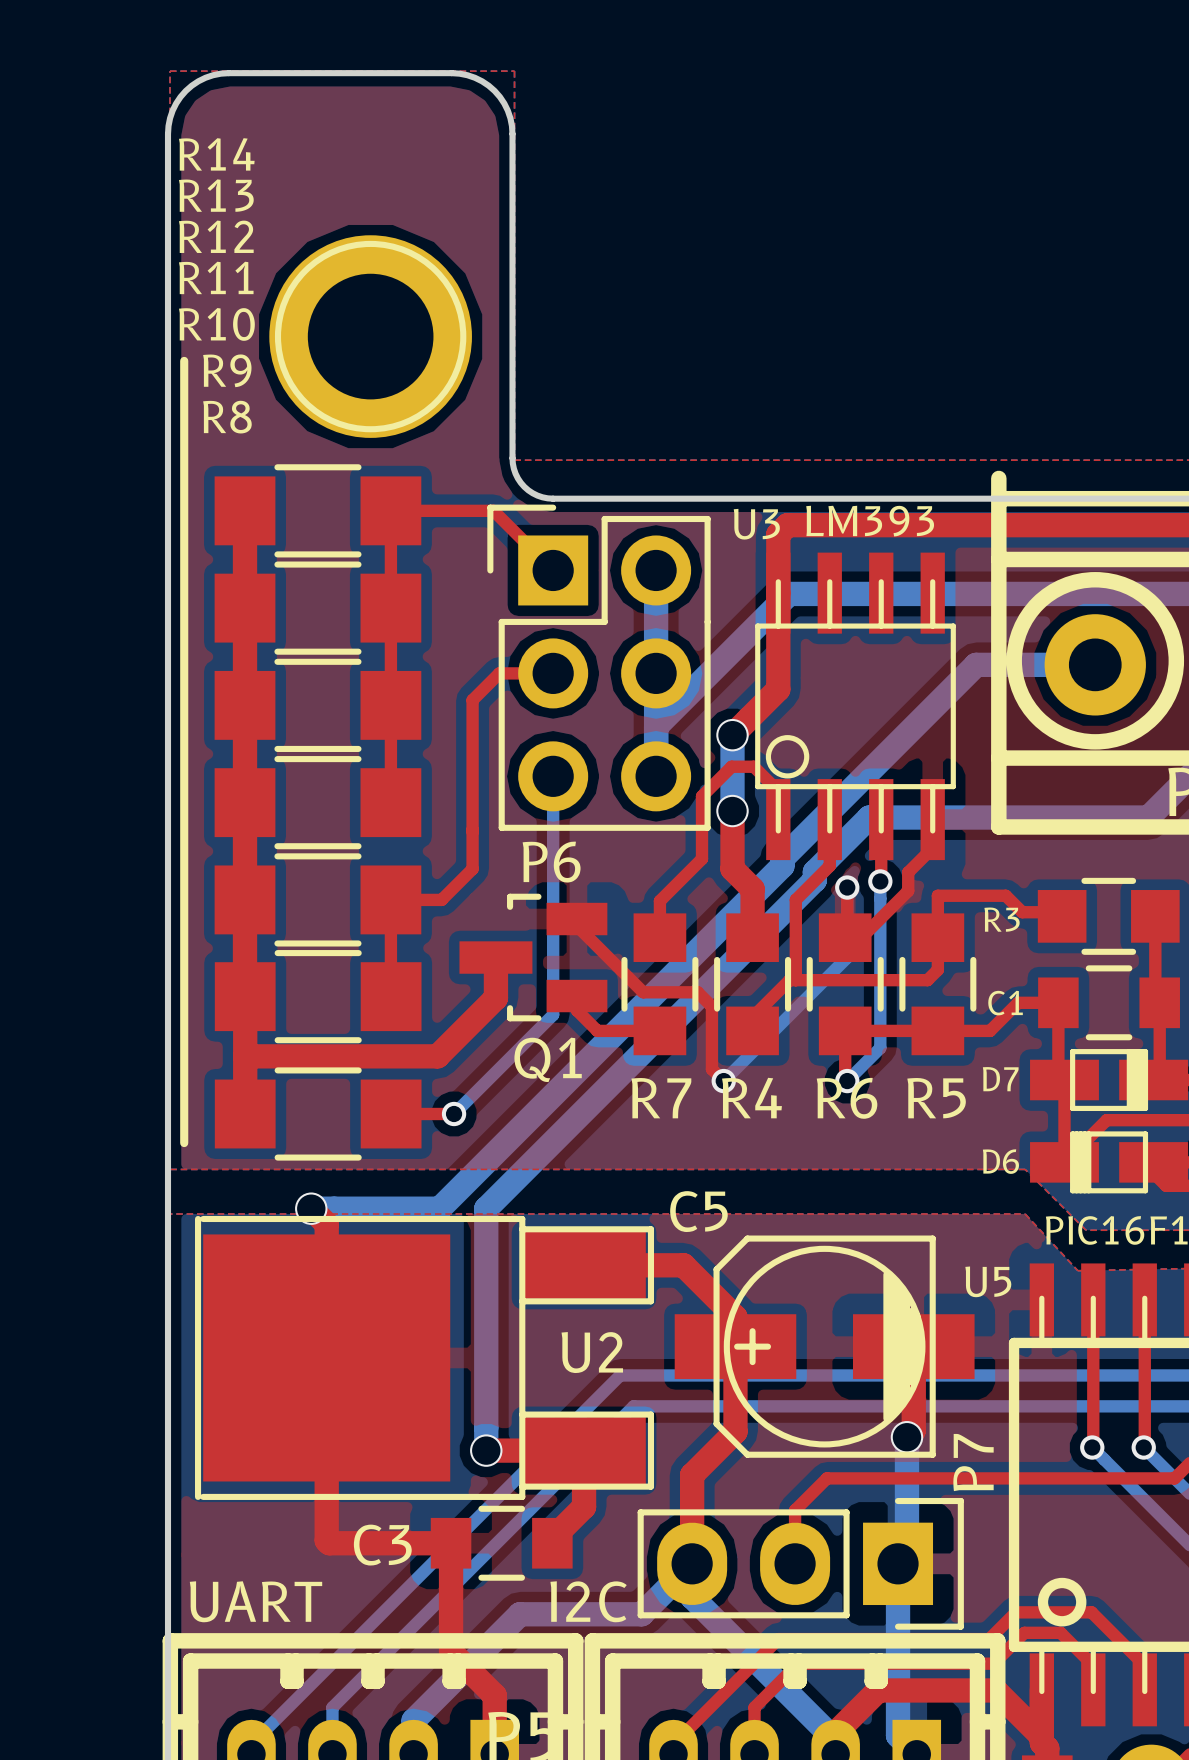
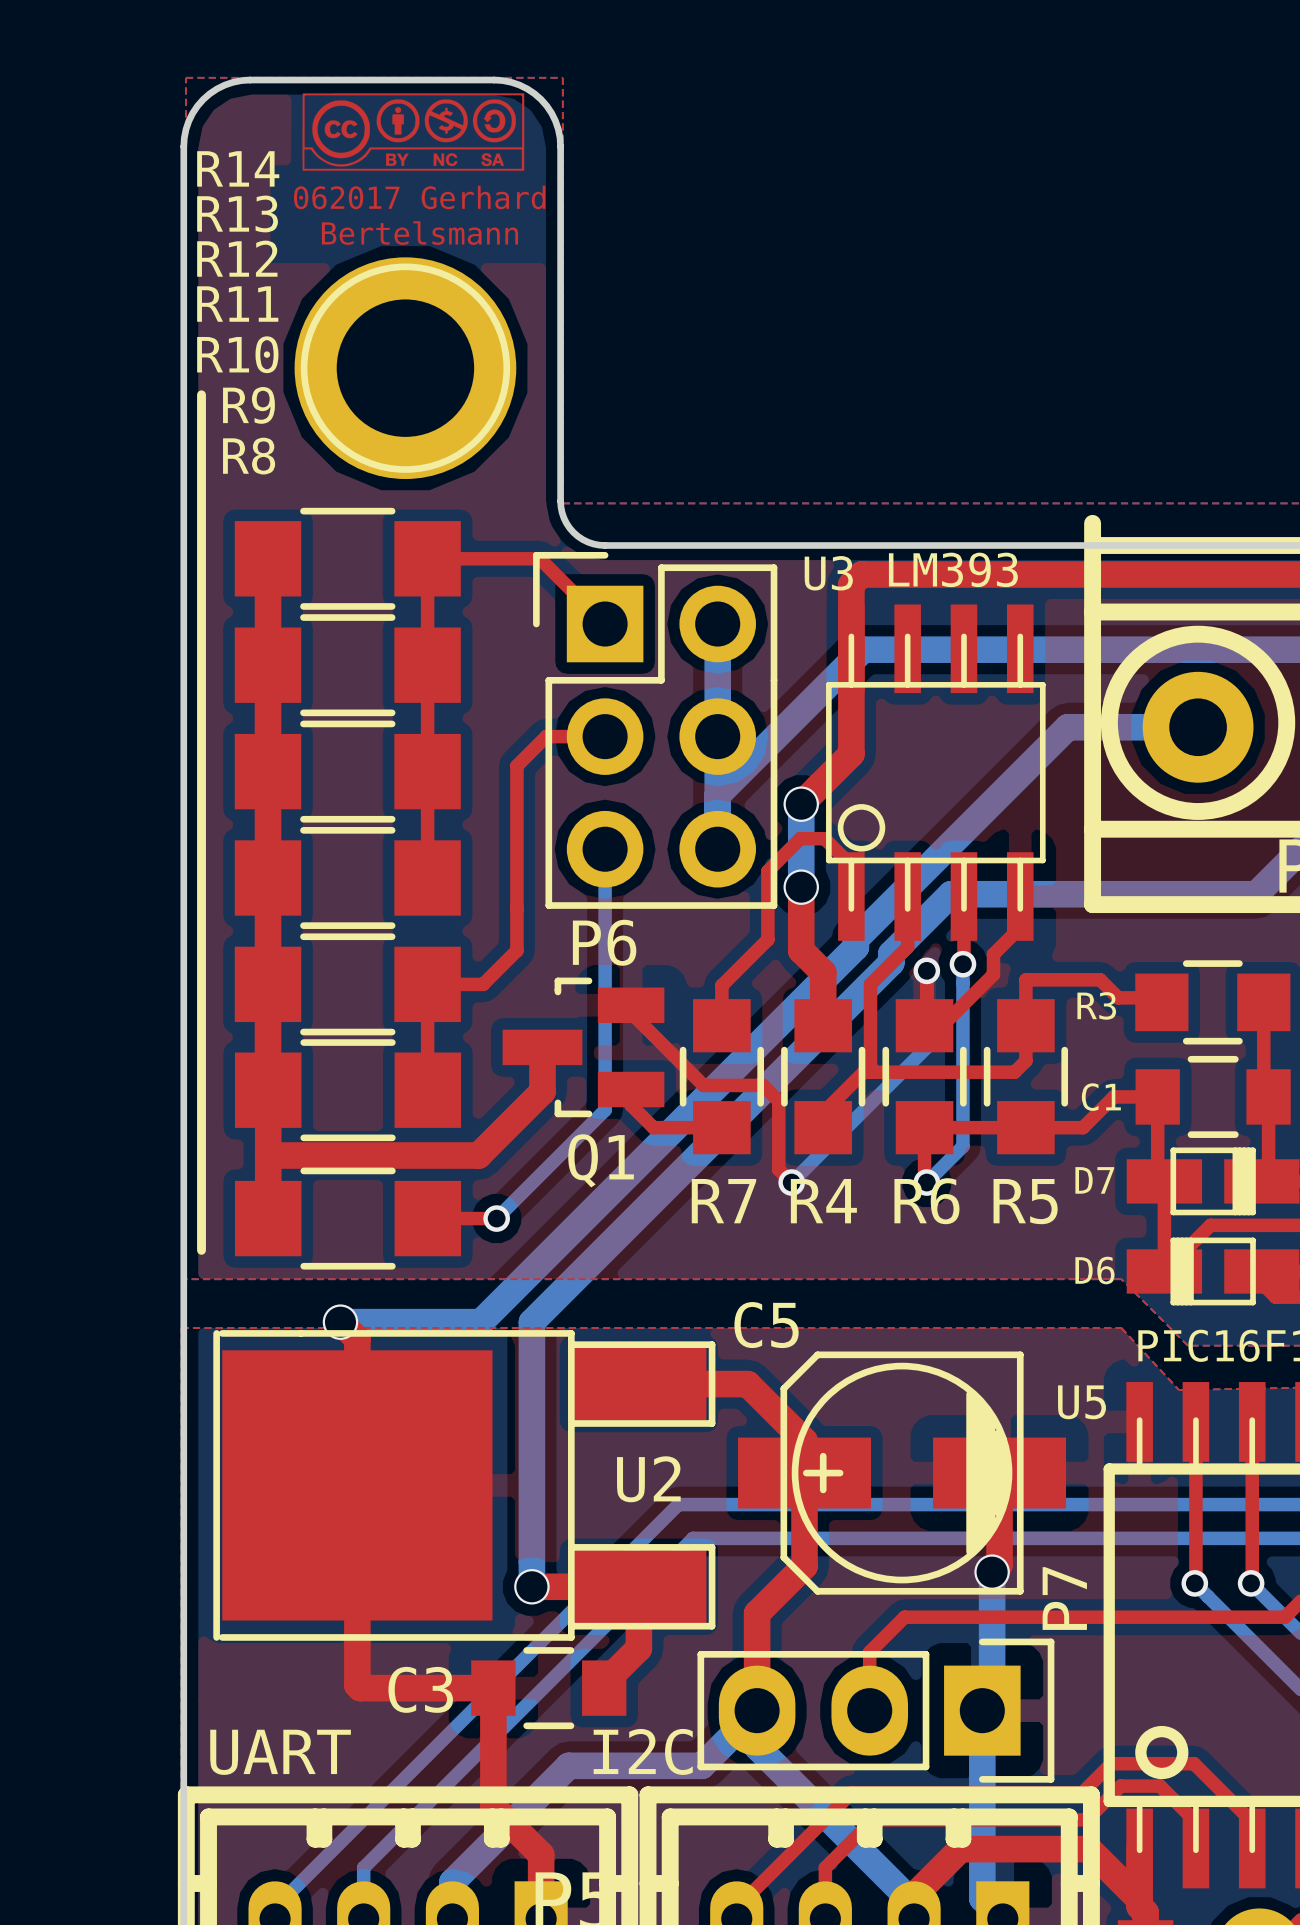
drawing: none -> [302, 93, 525, 171]
text: none -> 062017 Gerhard (419, 197)
text: none -> Bertelsmann (419, 233)

